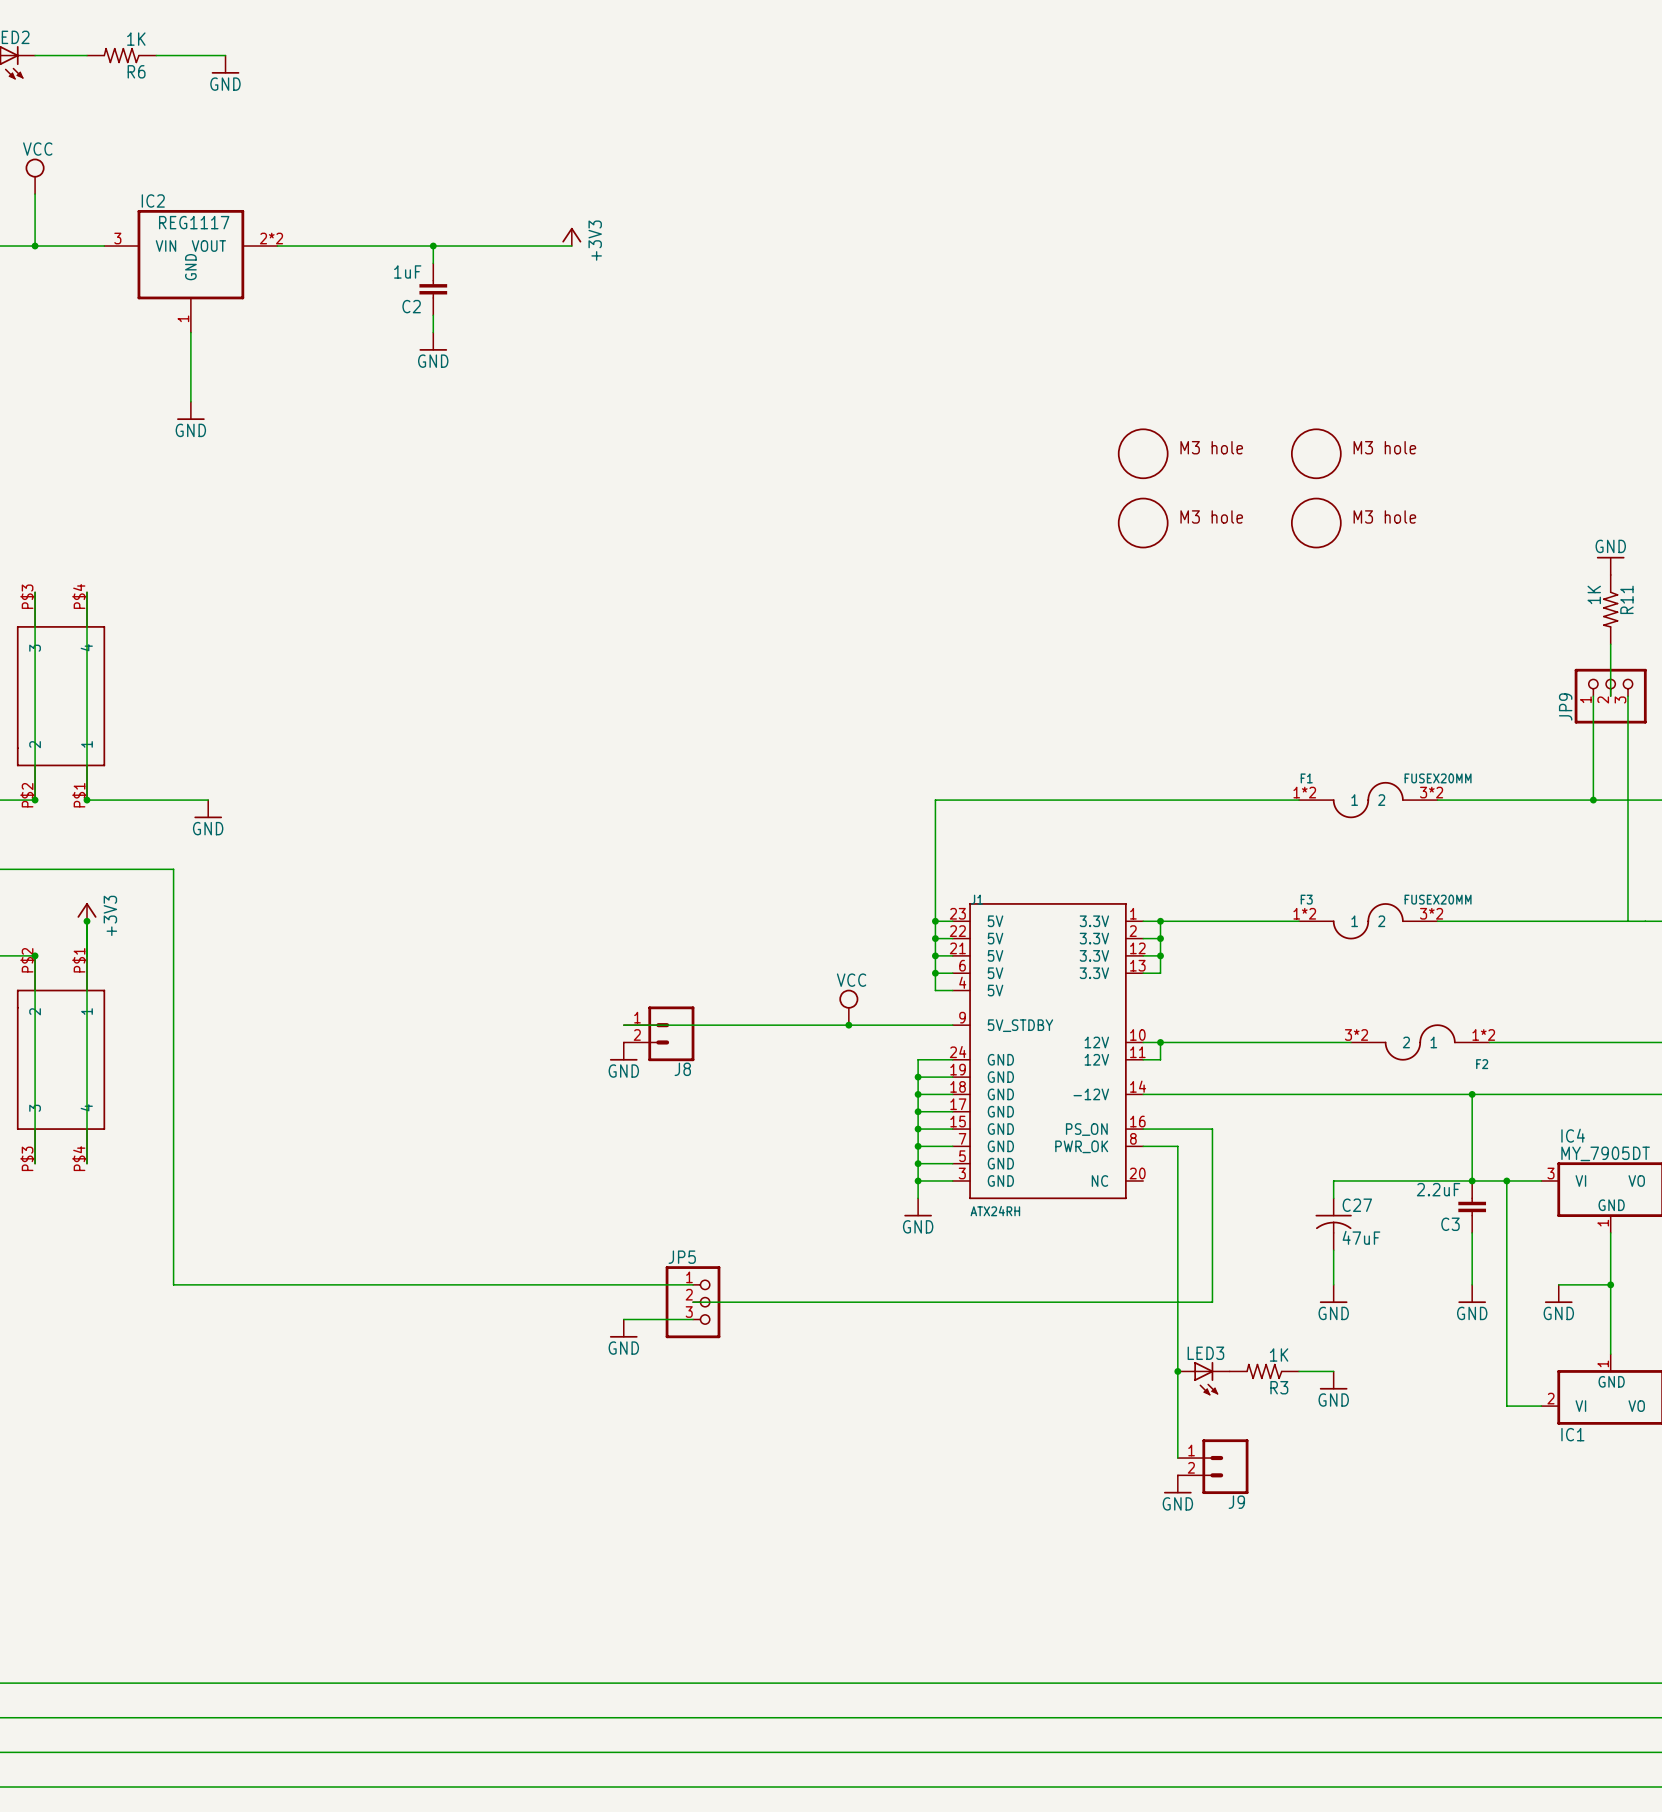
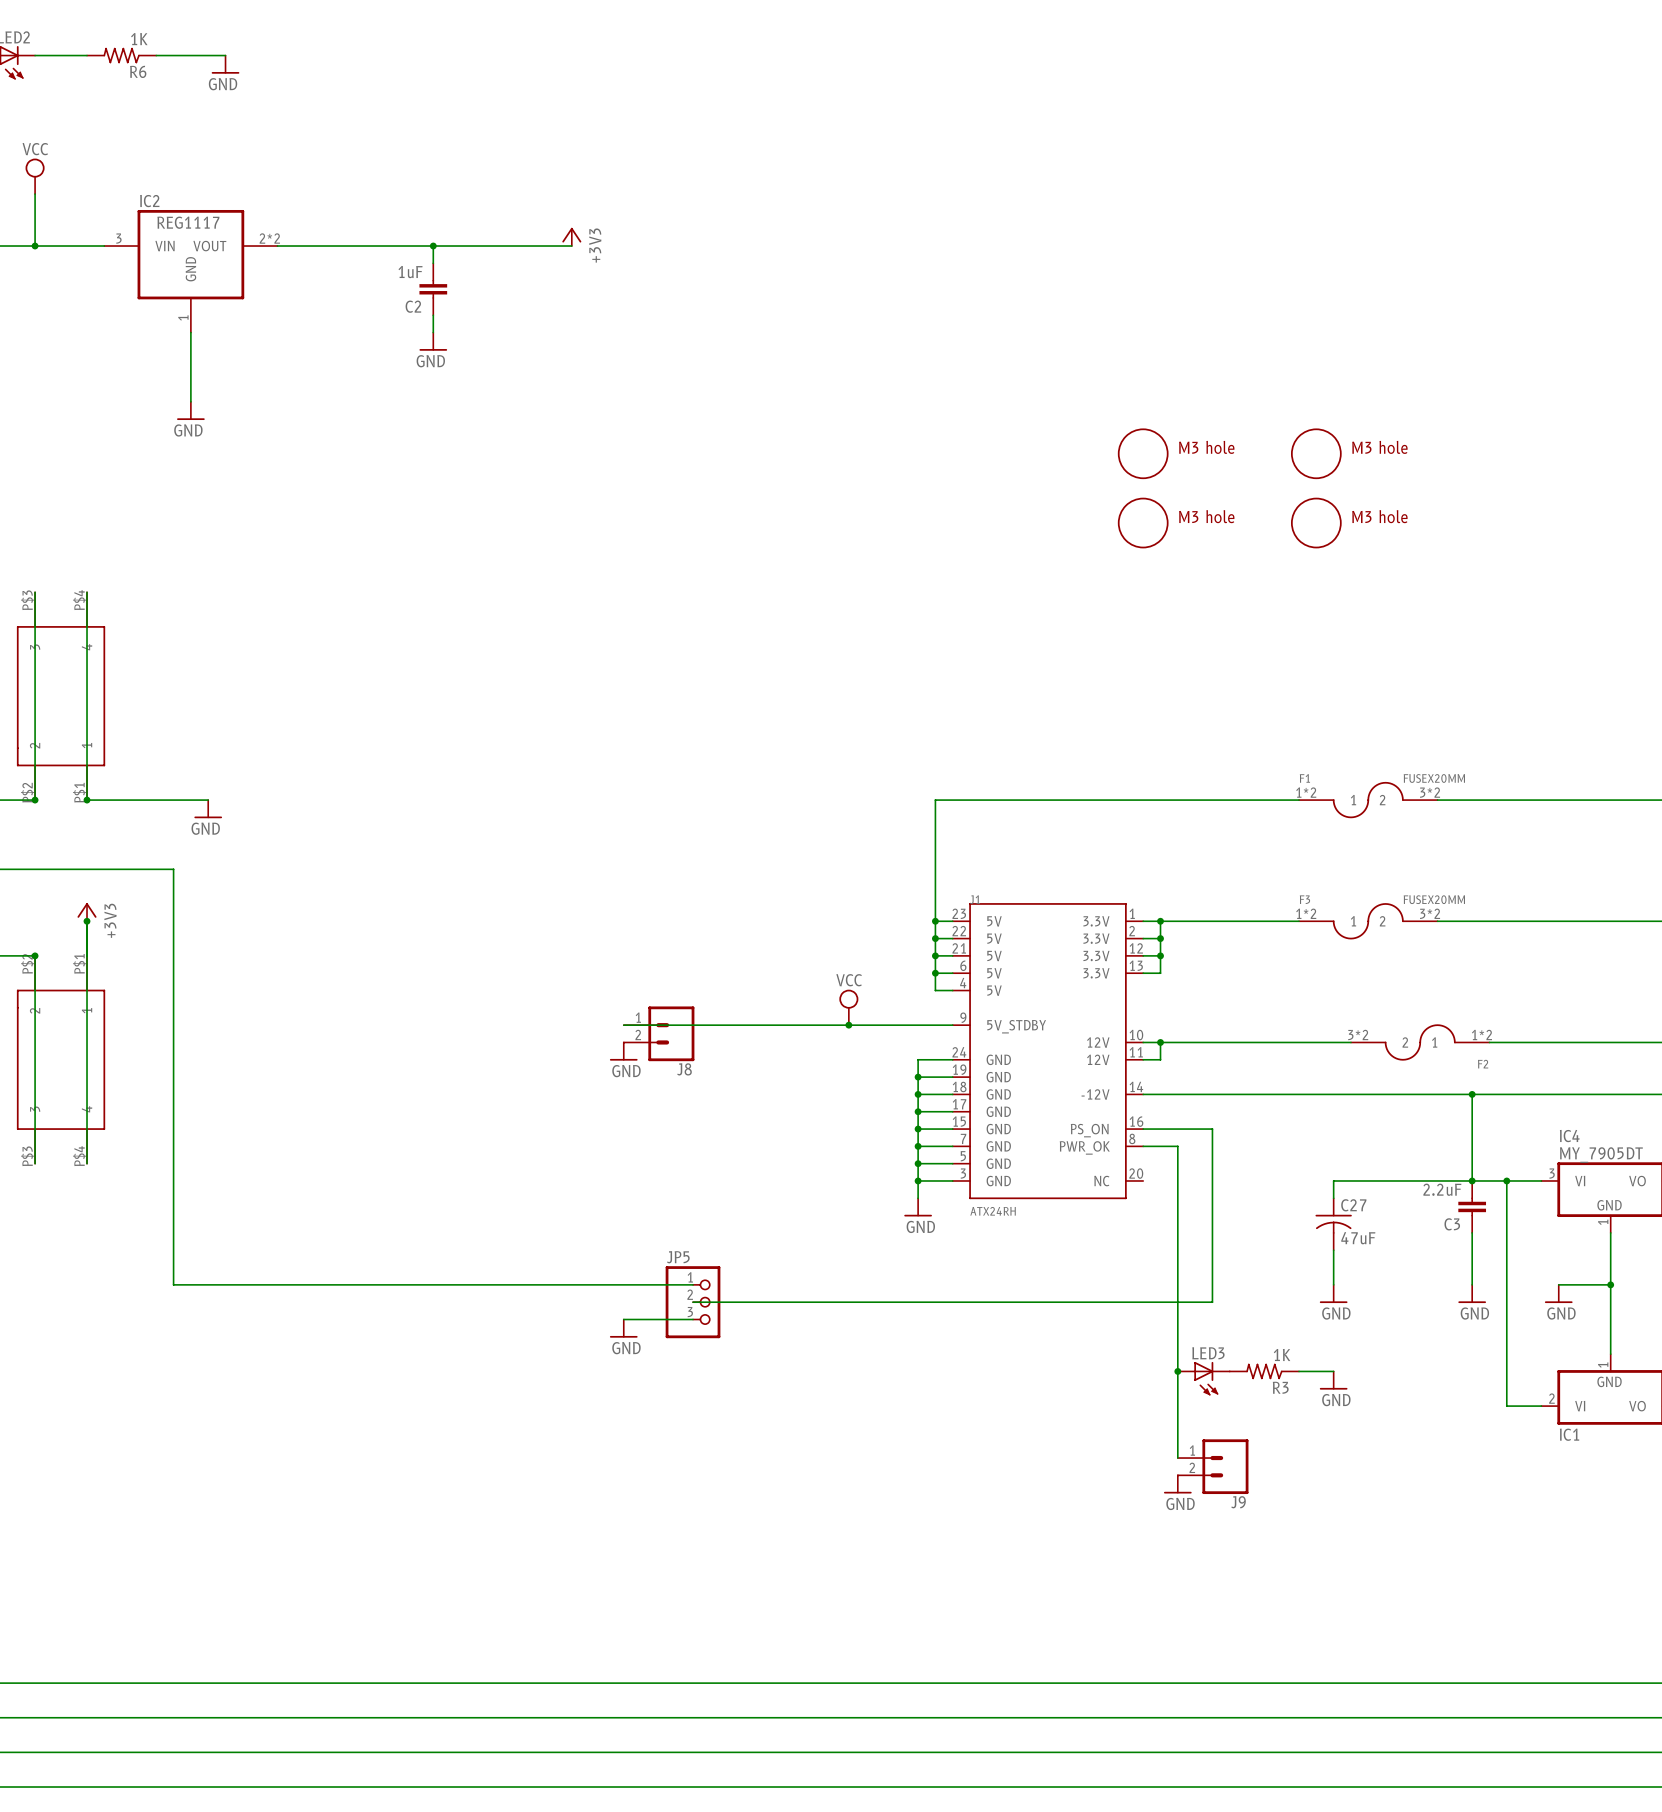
power symbol: GND (1610, 565) -> none
R11: 1K (1610, 609) -> none
wire: (1610, 644) (1610, 696) -> none
wire: (1593, 696) (1593, 800) -> none
JP9: (1610, 696) -> none
wire: (1628, 696) (1628, 921) -> none
junction: (1593, 800) -> none

